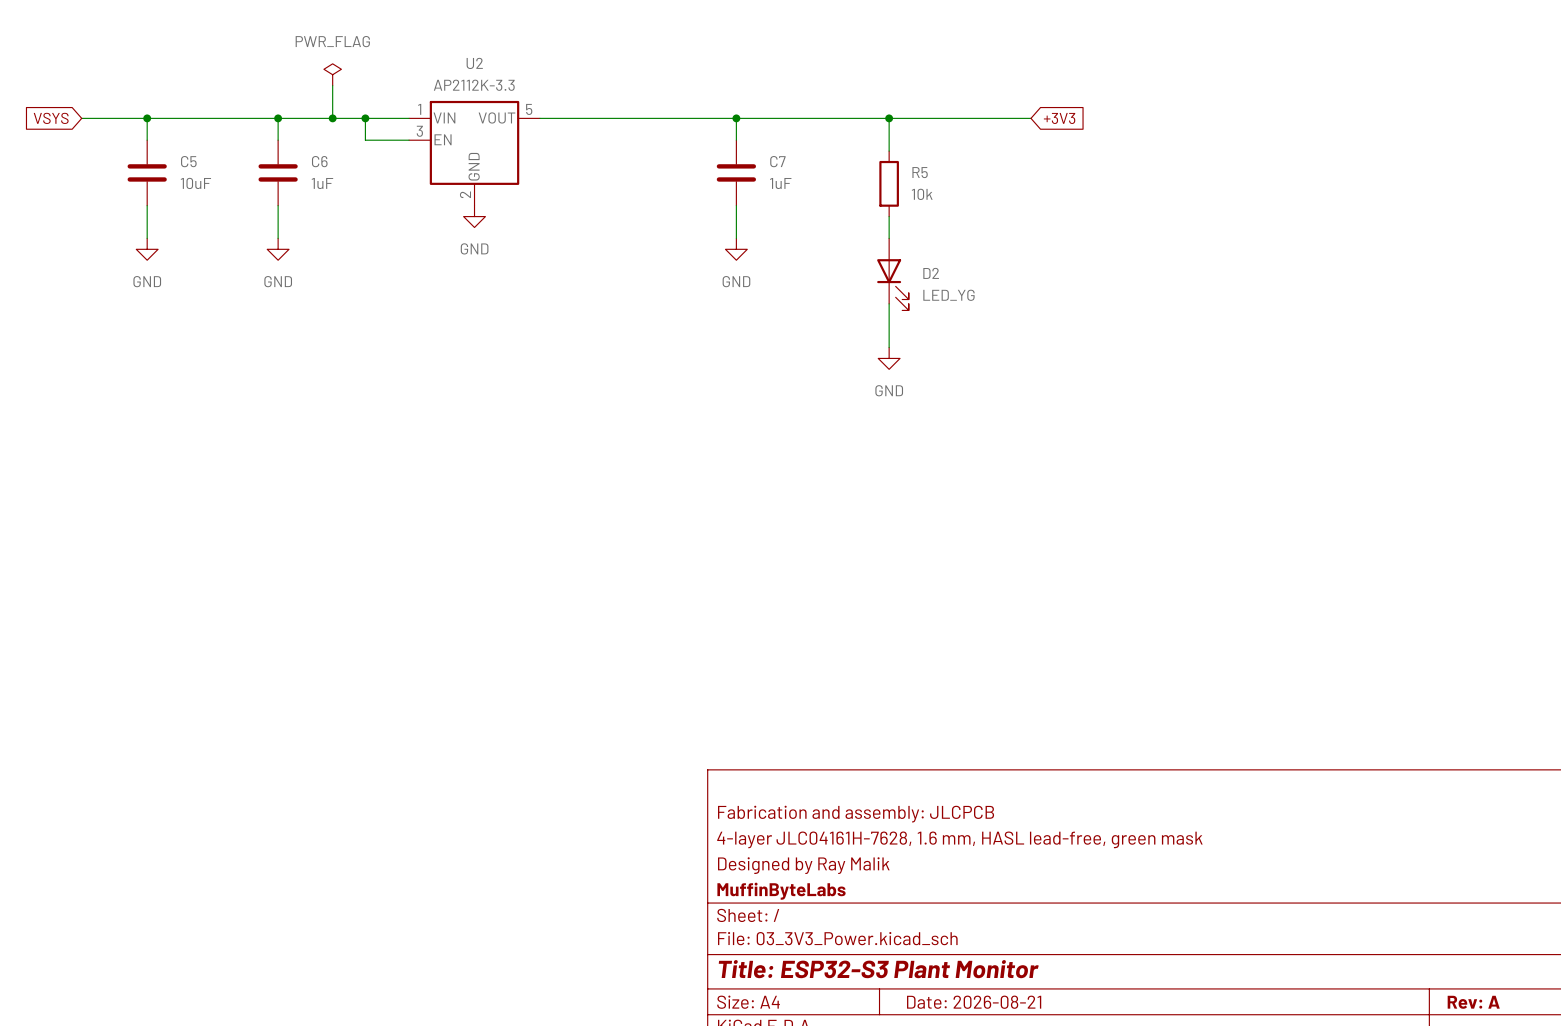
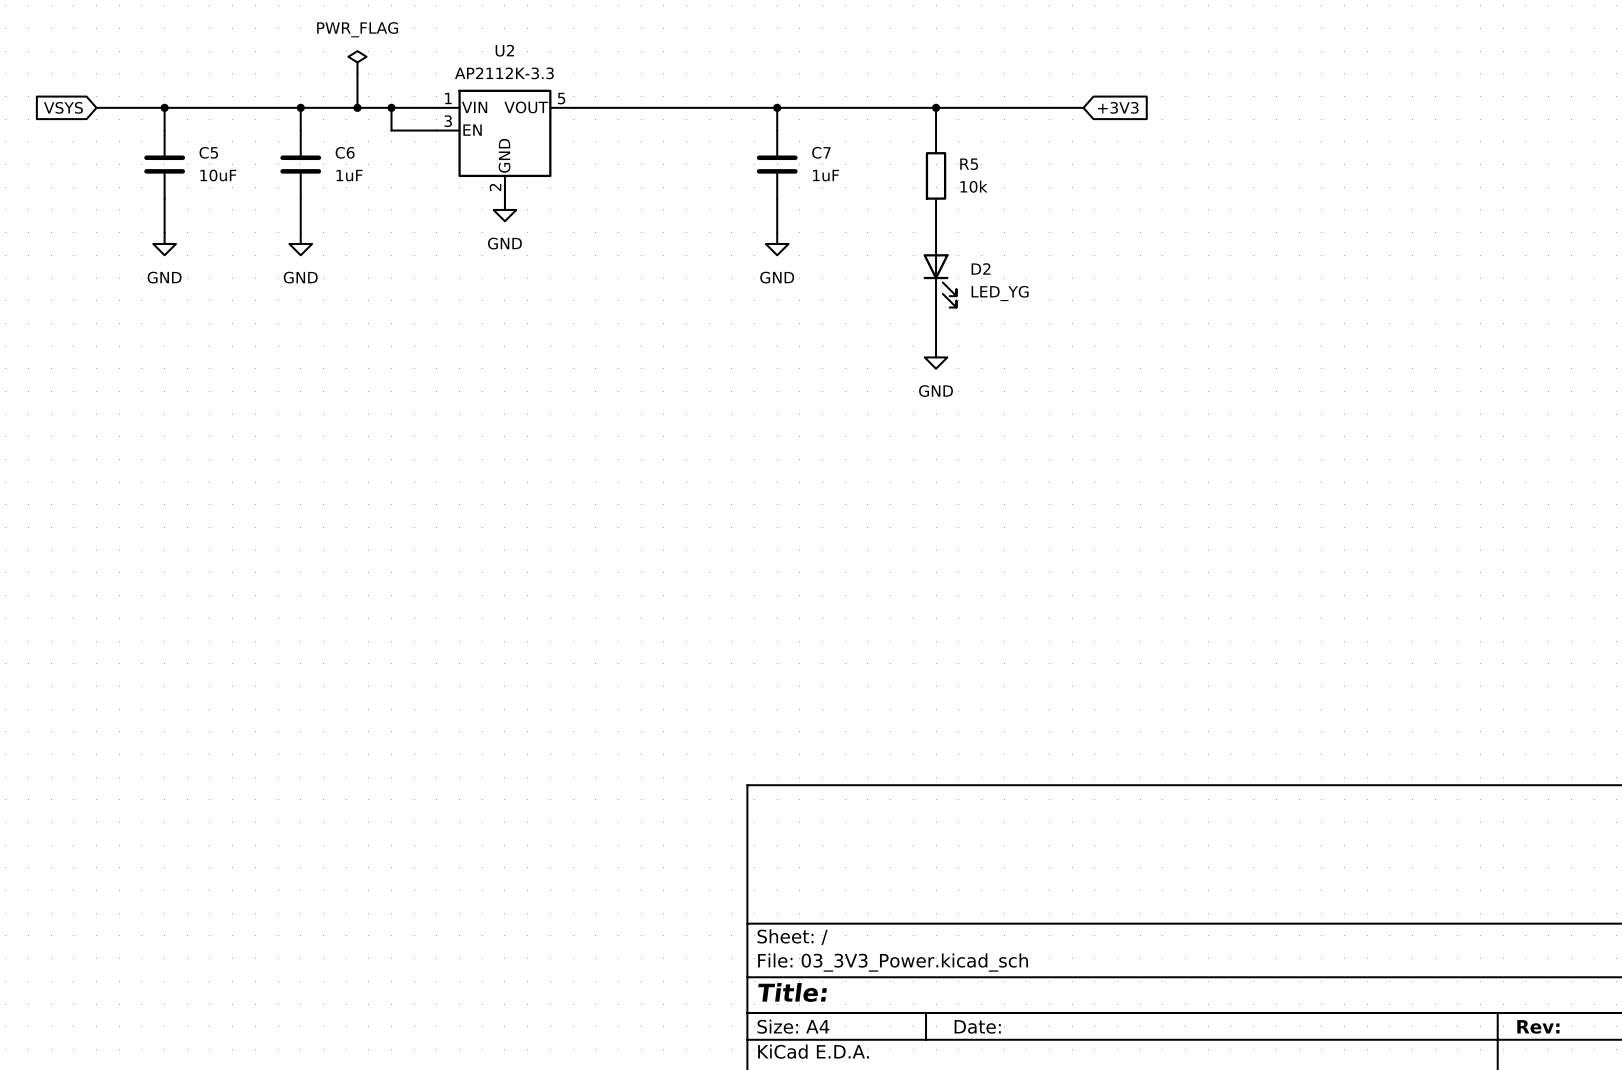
title block: Fabrication and assembly: JLCPCB (856, 814) -> none
title block: 4-layer JLC04161H-7628, 1.6 mm, HASL lead-free, green mask (959, 839) -> none
title block: Designed by Ray Malik (803, 865) -> none
title block: MuffinByteLabs (781, 891) -> none
title block: Title: ESP32-S3 Plant Monitor (878, 969) -> Title: (792, 992)
title block: Date: 2026-08-21 (974, 1002) -> Date: (977, 1026)
title block: Rev: A (1473, 1002) -> Rev: (1538, 1026)

